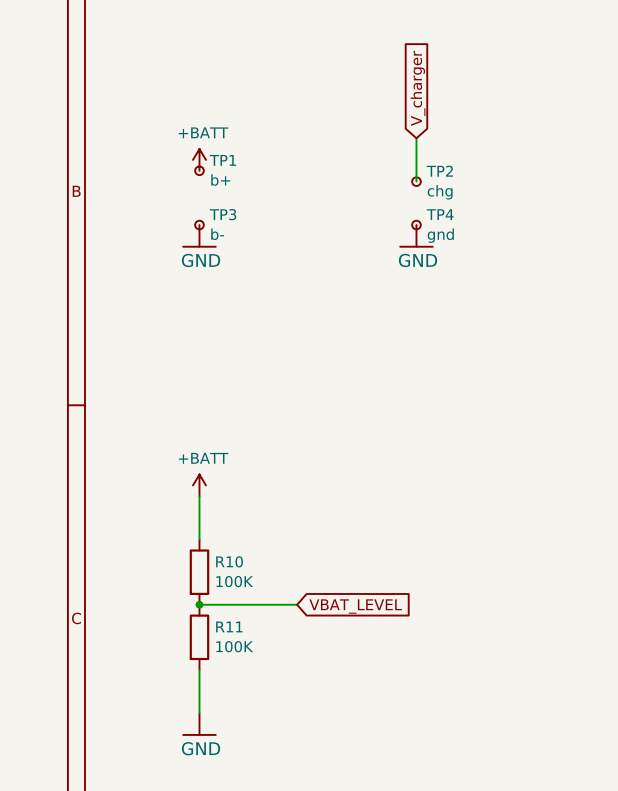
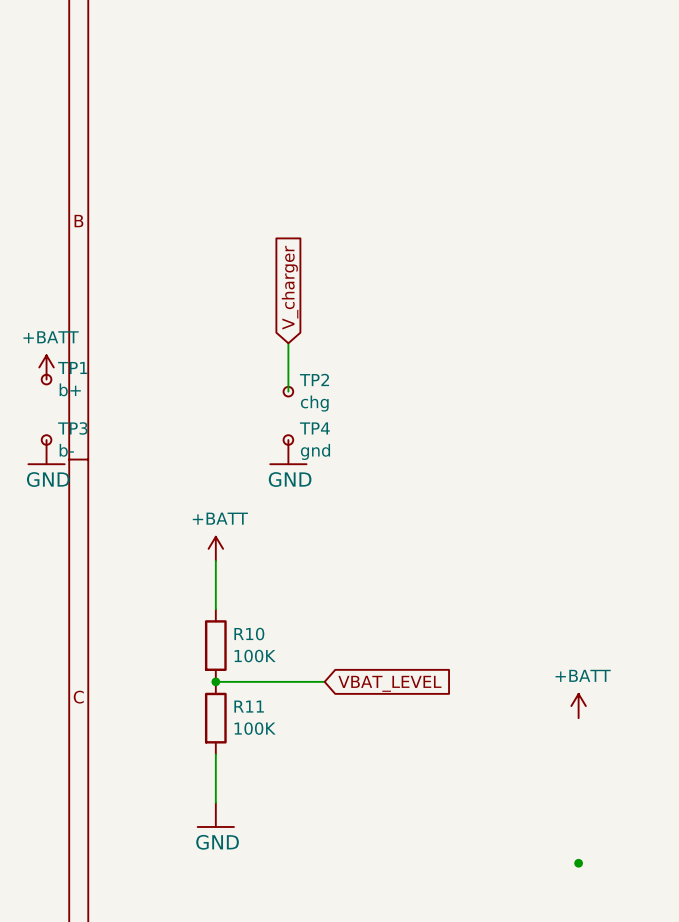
global label: V_charger (418, 88) -> none
wire: (416, 138) (416, 181) -> none
power symbol: +BATT (199, 159) -> none
TP1 position: (199, 170) -> (46, 379)
TP2 position: (416, 181) -> (288, 391)
TP3 position: (199, 225) -> (46, 440)
TP4 position: (416, 225) -> (288, 440)
power symbol: GND (199, 235) -> none
power symbol: GND (416, 235) -> none
global label: none -> V_charger (290, 287)
wire: none -> (288, 343) (288, 391)
power symbol: none -> +BATT (46, 367)
power symbol: none -> GND (46, 452)
power symbol: none -> GND (288, 452)
power symbol: none -> +BATT (578, 706)
junction: none -> (578, 863)

